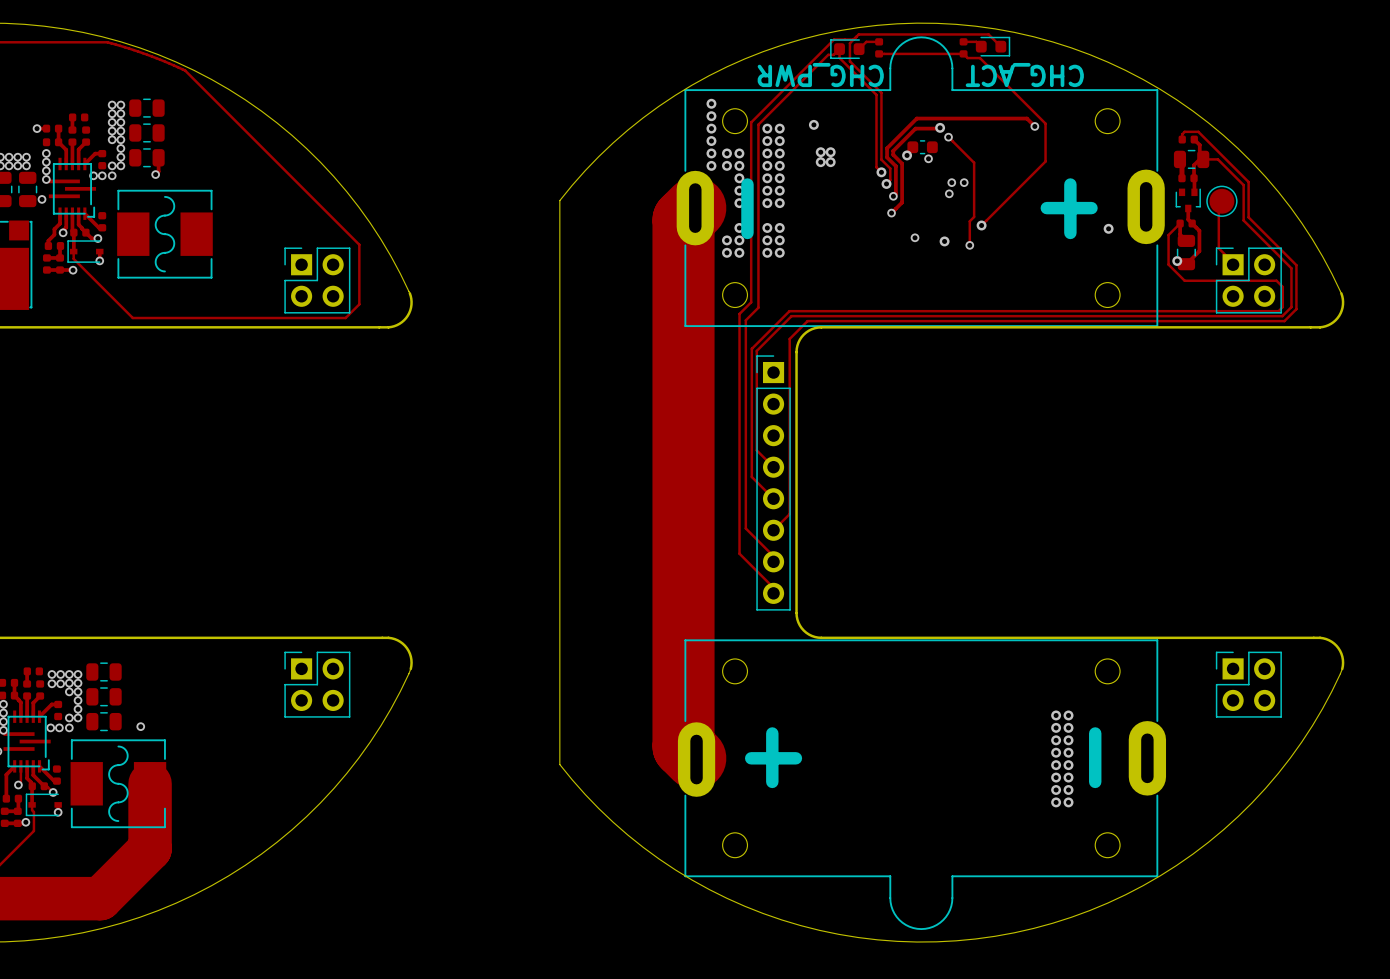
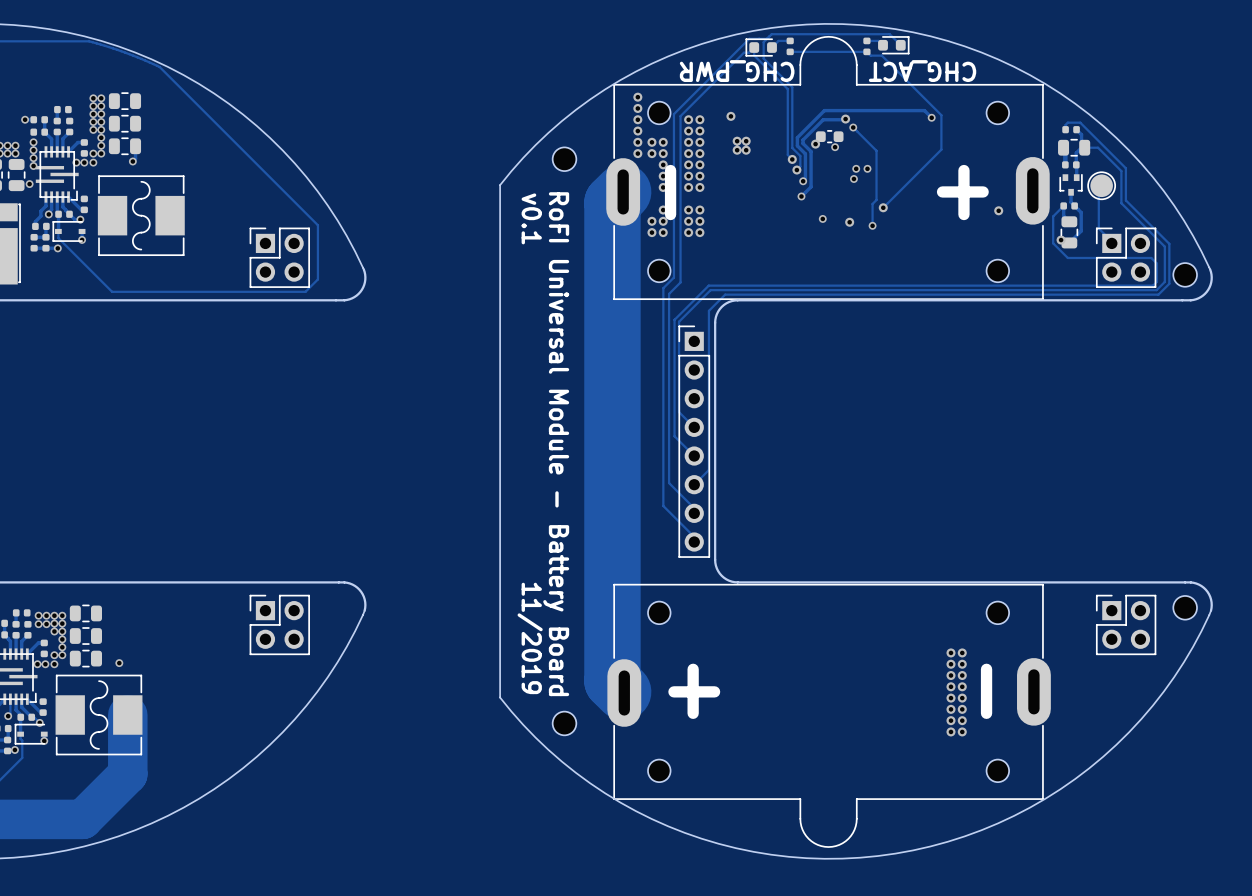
part: none -> (564, 159)
part: none -> (1185, 274)
text: none -> v0.1 11/2019 (530, 443)
text: none -> RoFI Universal Module - Battery Board (556, 444)
part: none -> (1185, 607)
part: none -> (564, 723)

